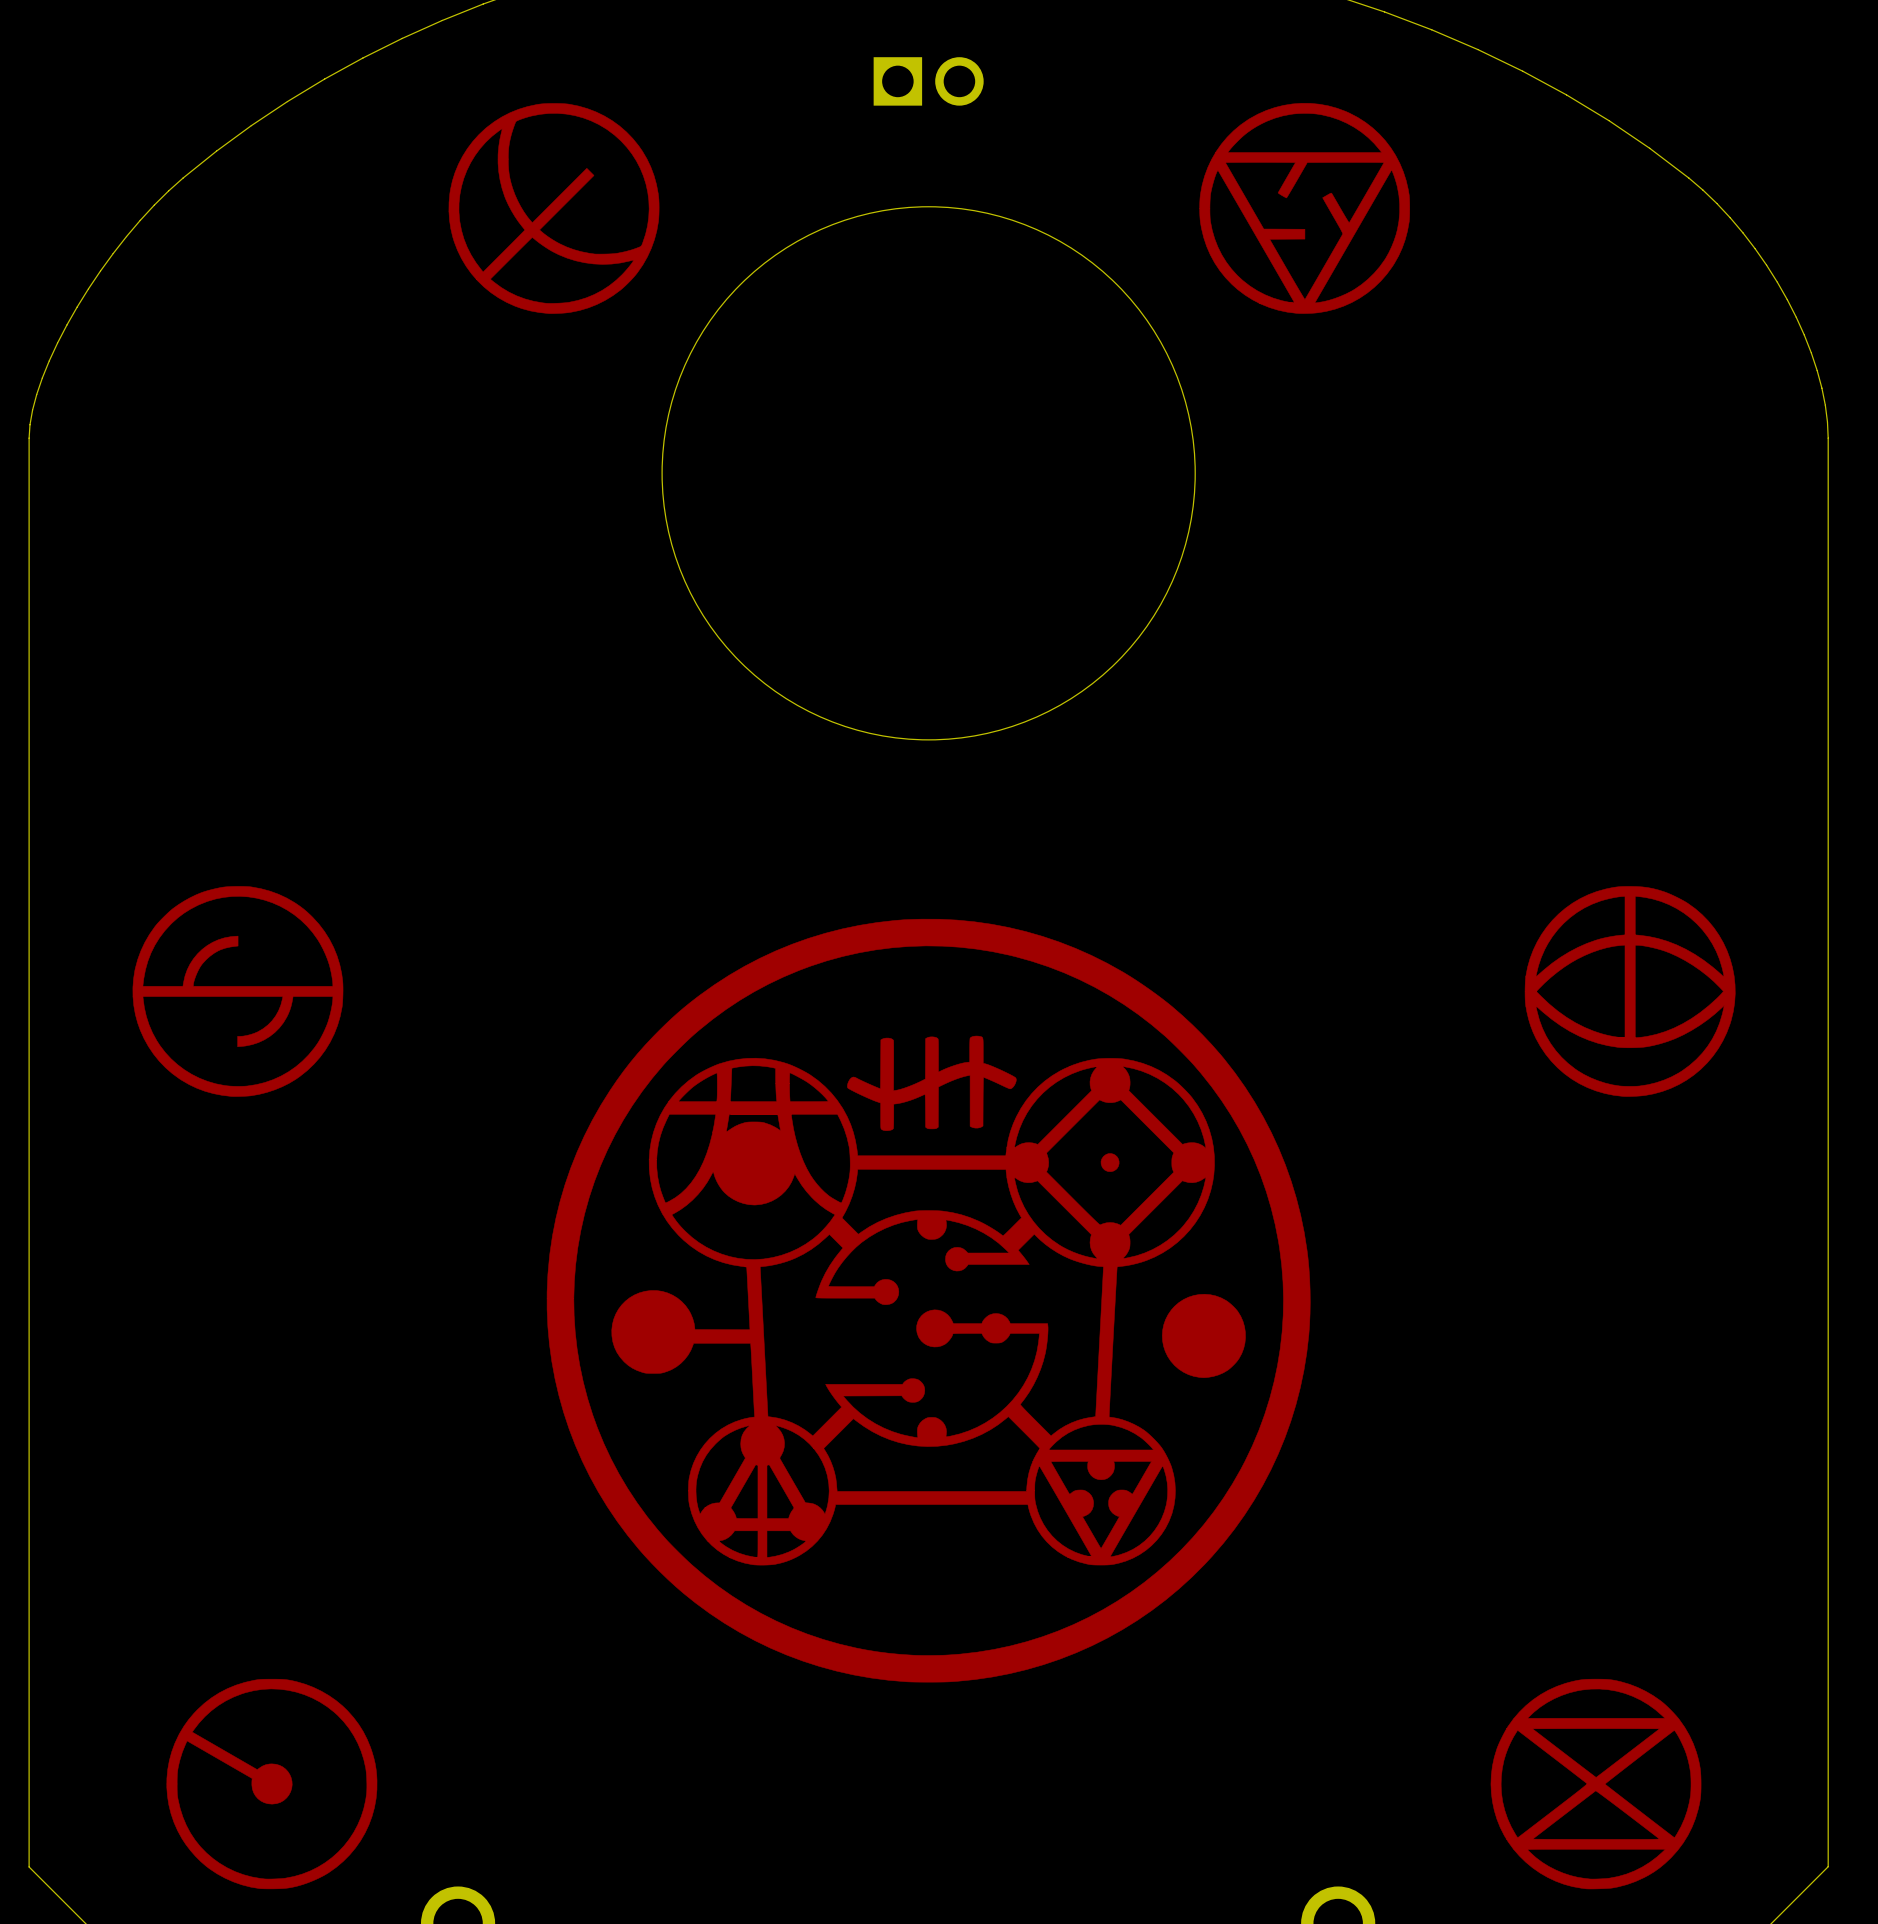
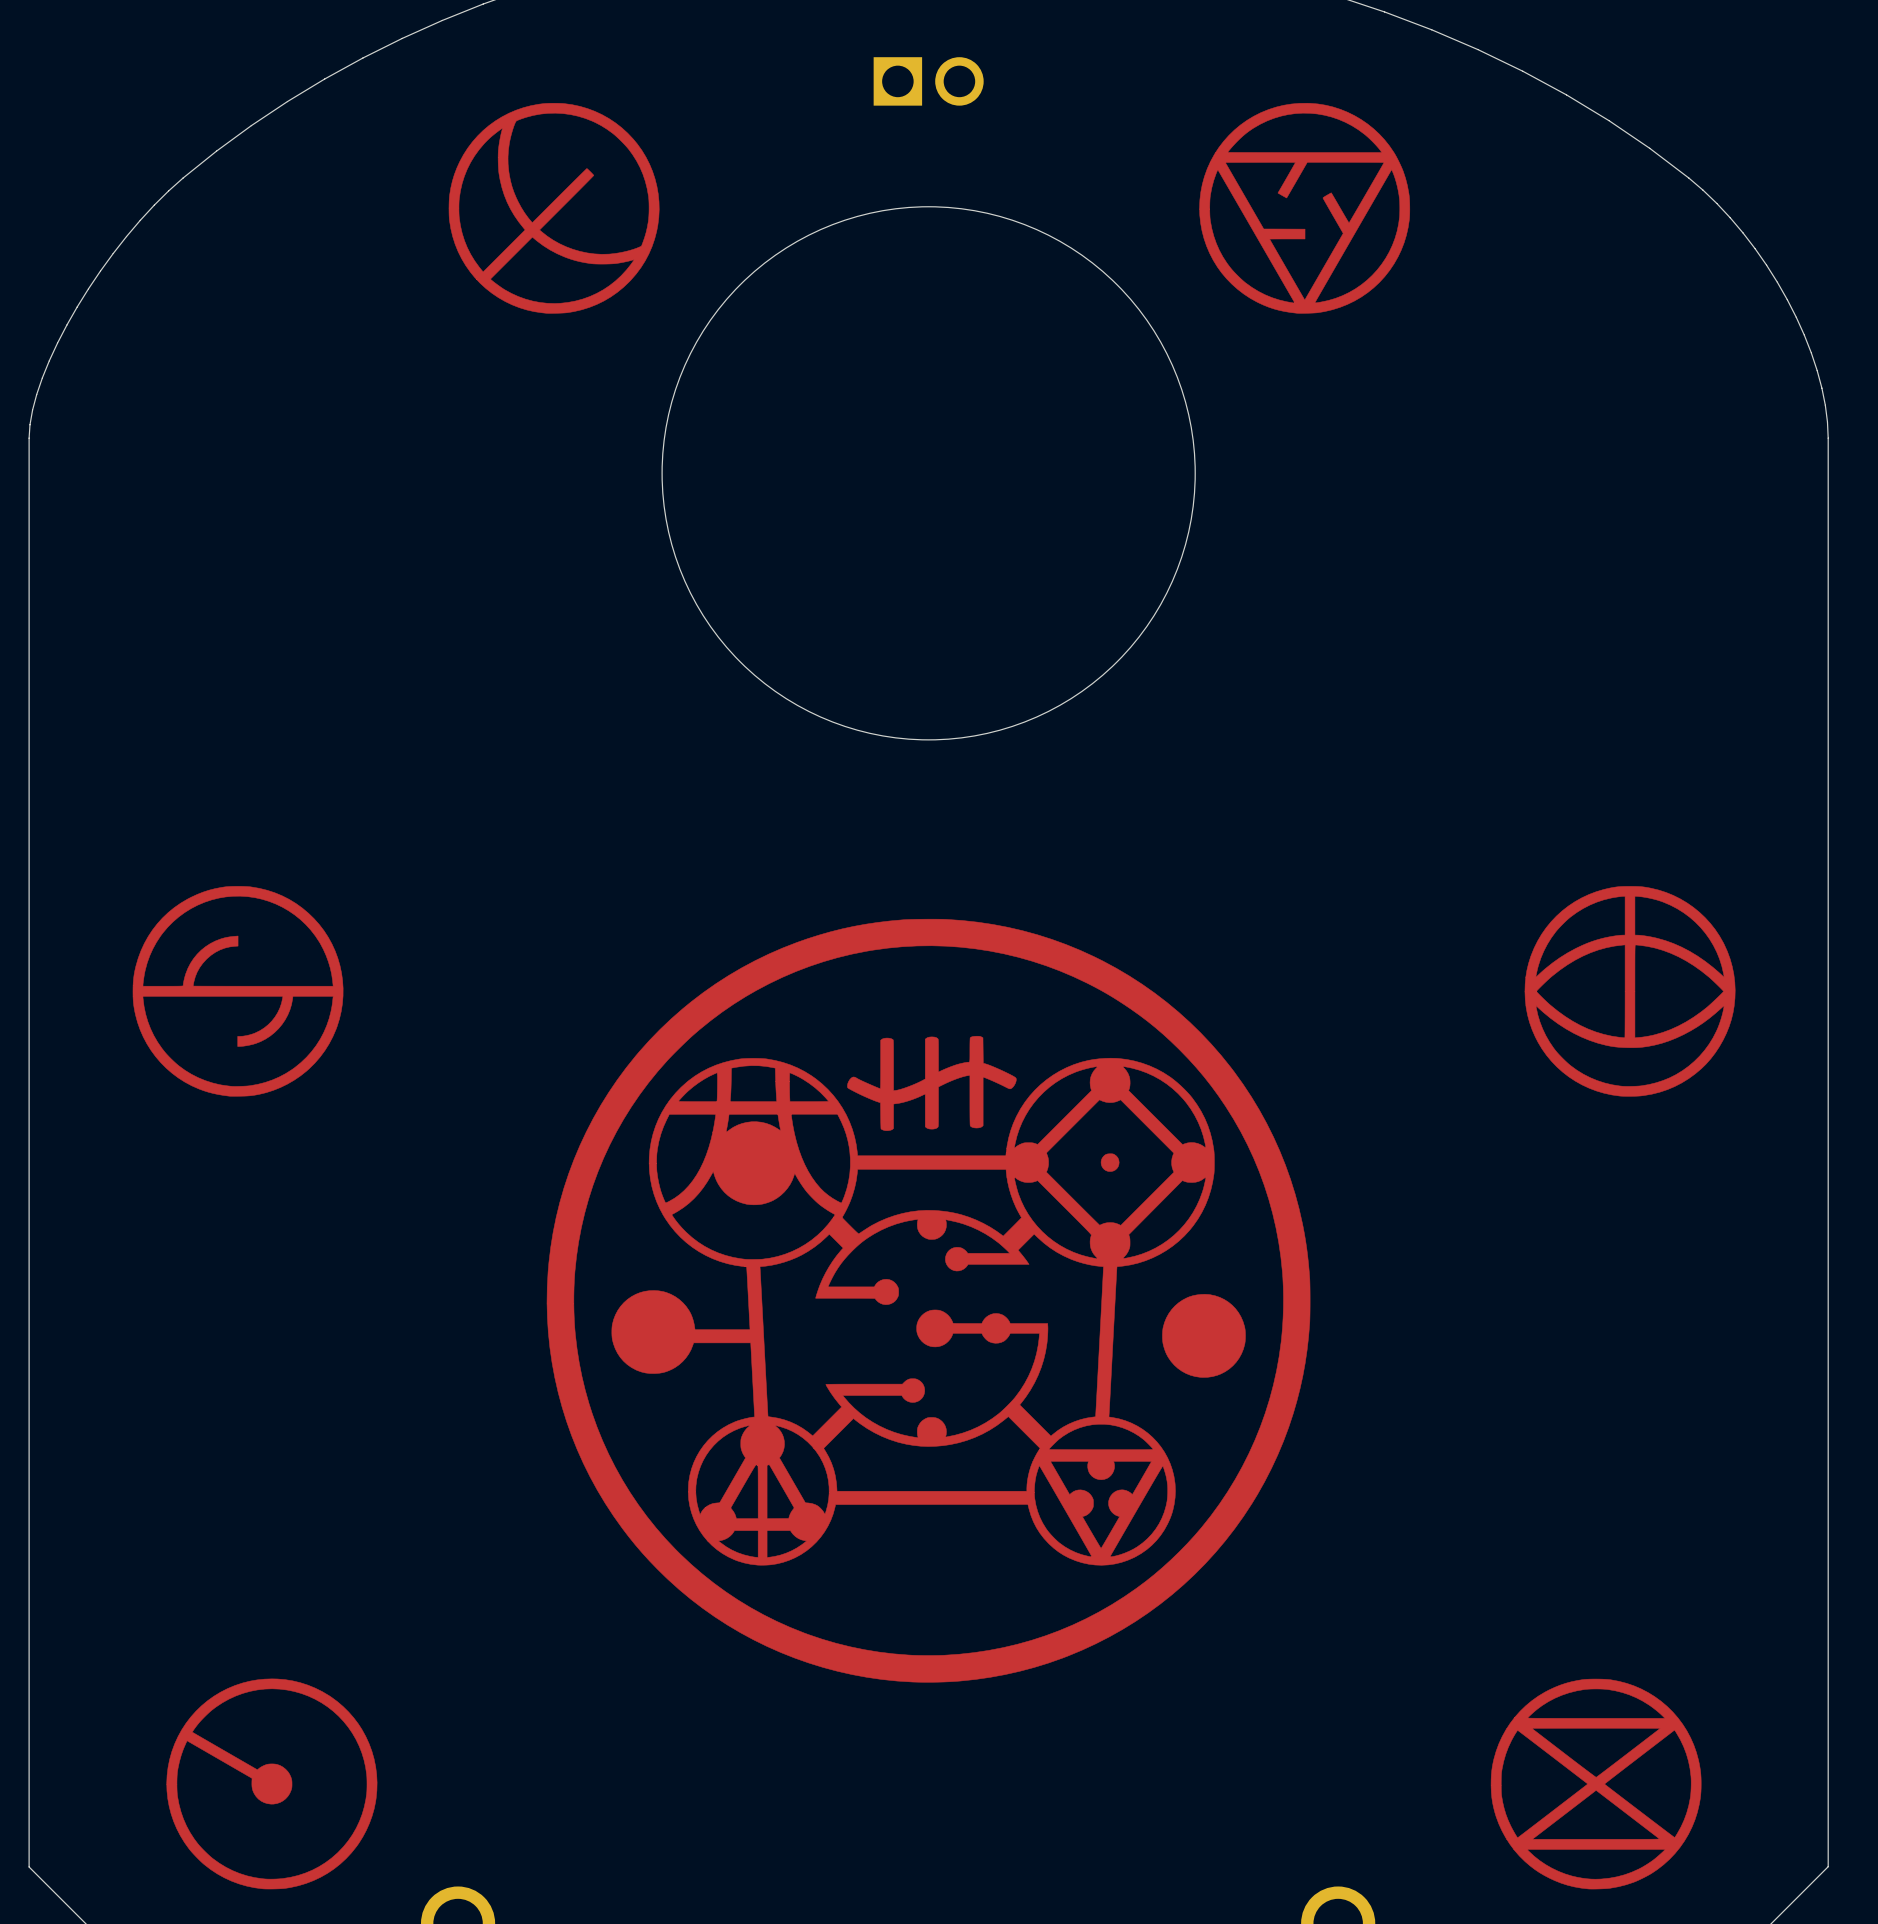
drawing shape: [132, 103, 1736, 1890] -> [132, 102, 1736, 1890]

